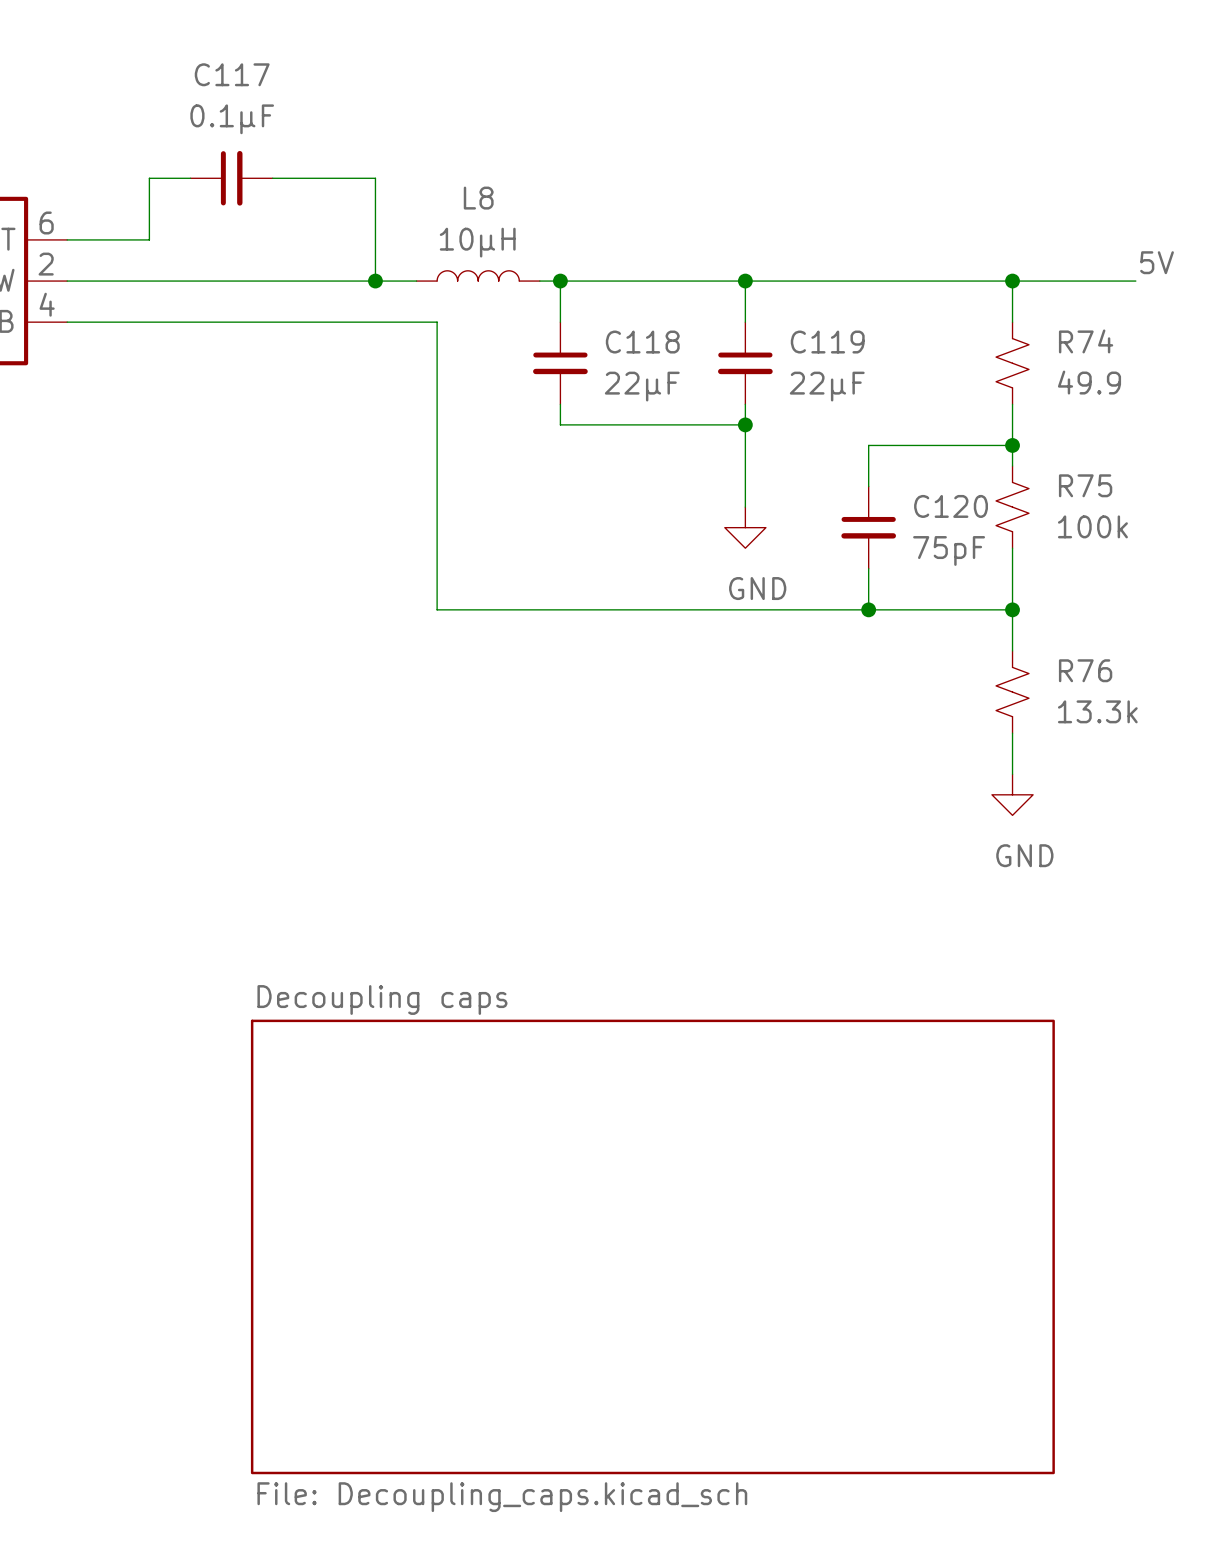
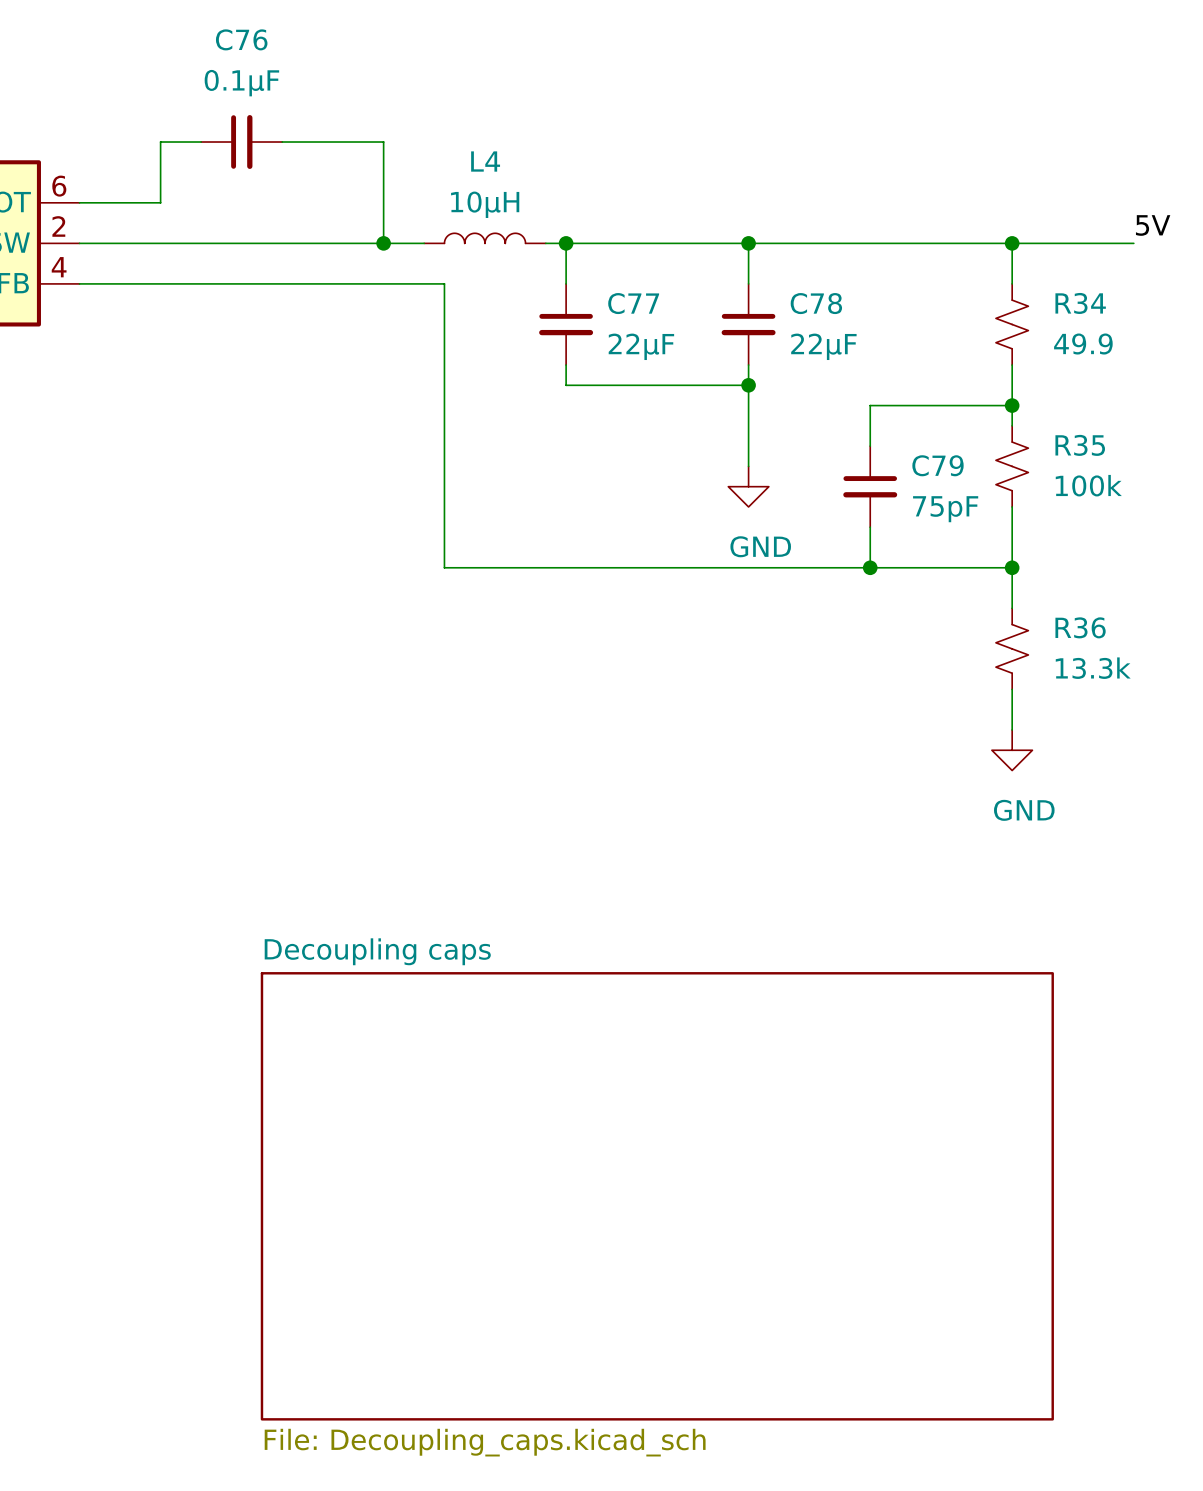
C117 name: C117 (232, 74) -> C76 (241, 39)
L8 name: L8 (478, 198) -> L4 (485, 161)
R74 name: R74 (1086, 341) -> R34 (1080, 303)
C118 name: C118 (642, 342) -> C77 (633, 303)
C119 name: C119 (827, 342) -> C78 (816, 303)
R75 name: R75 (1085, 485) -> R35 (1080, 445)
C120 name: C120 (951, 506) -> C79 (937, 465)
R76 name: R76 (1085, 670) -> R36 (1080, 627)

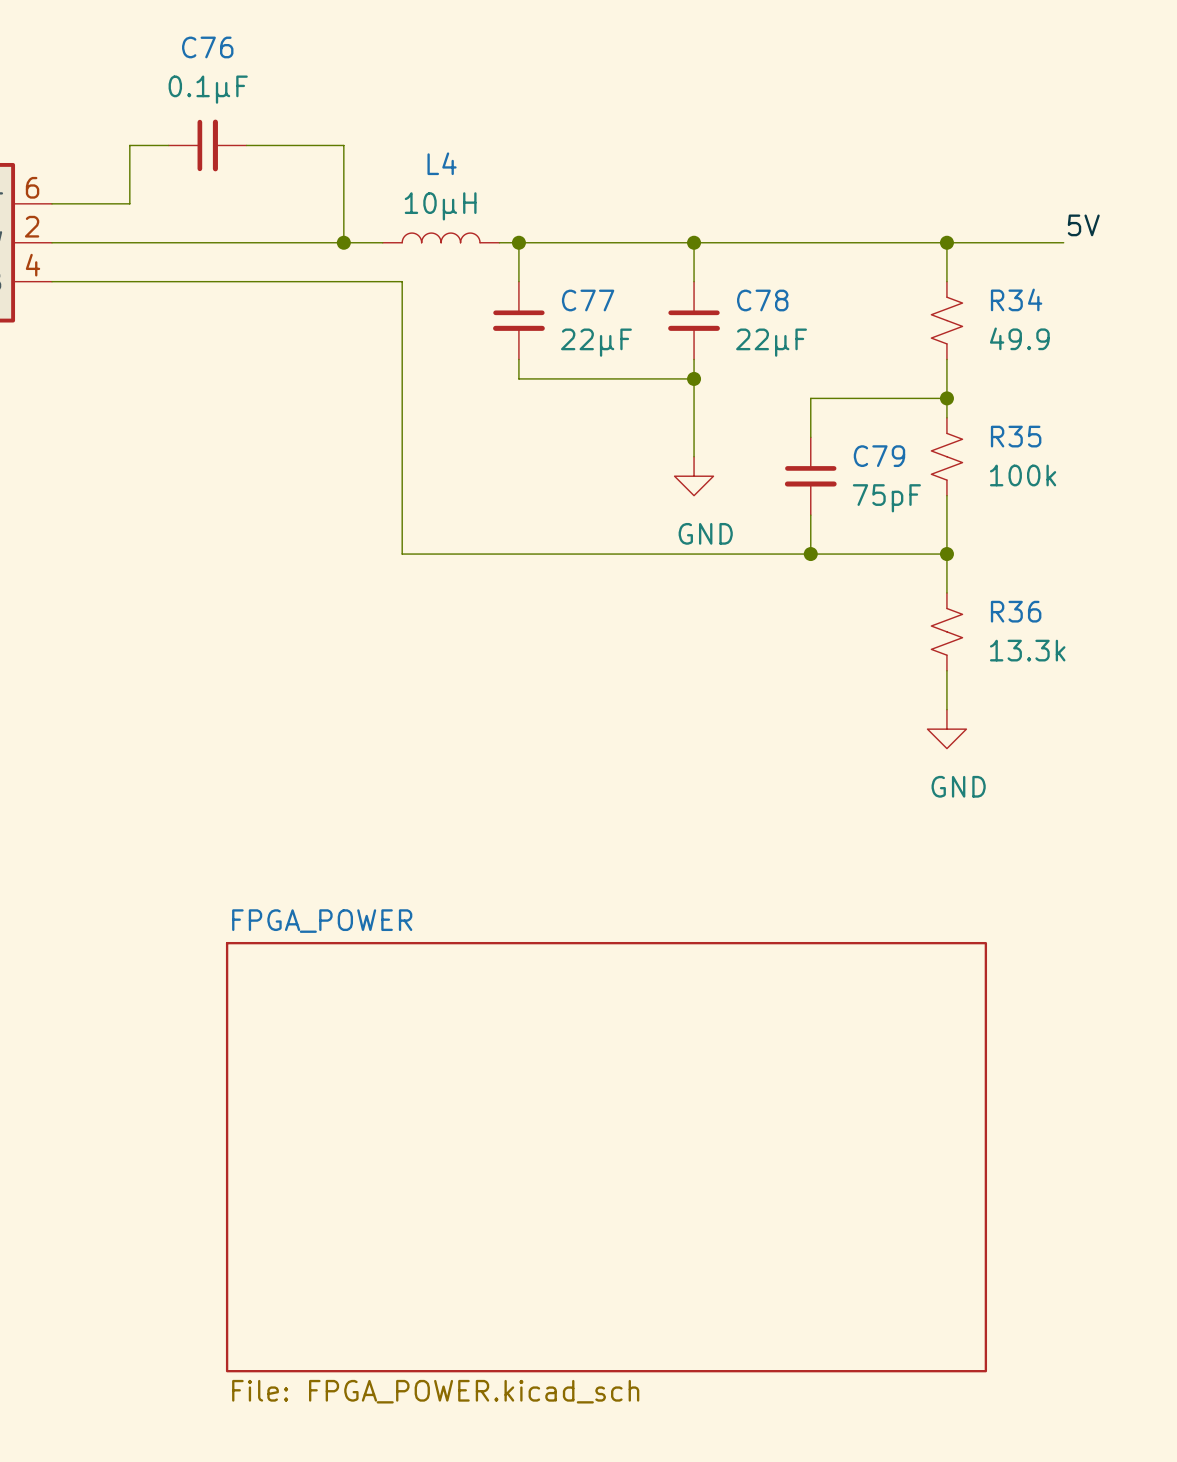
sheet Decoupling caps name: Decoupling caps (377, 951) -> FPGA_POWER (322, 921)
sheet Decoupling caps value: File: Decoupling_caps.kicad_sch (485, 1442) -> File: FPGA_POWER.kicad_sch (435, 1391)

